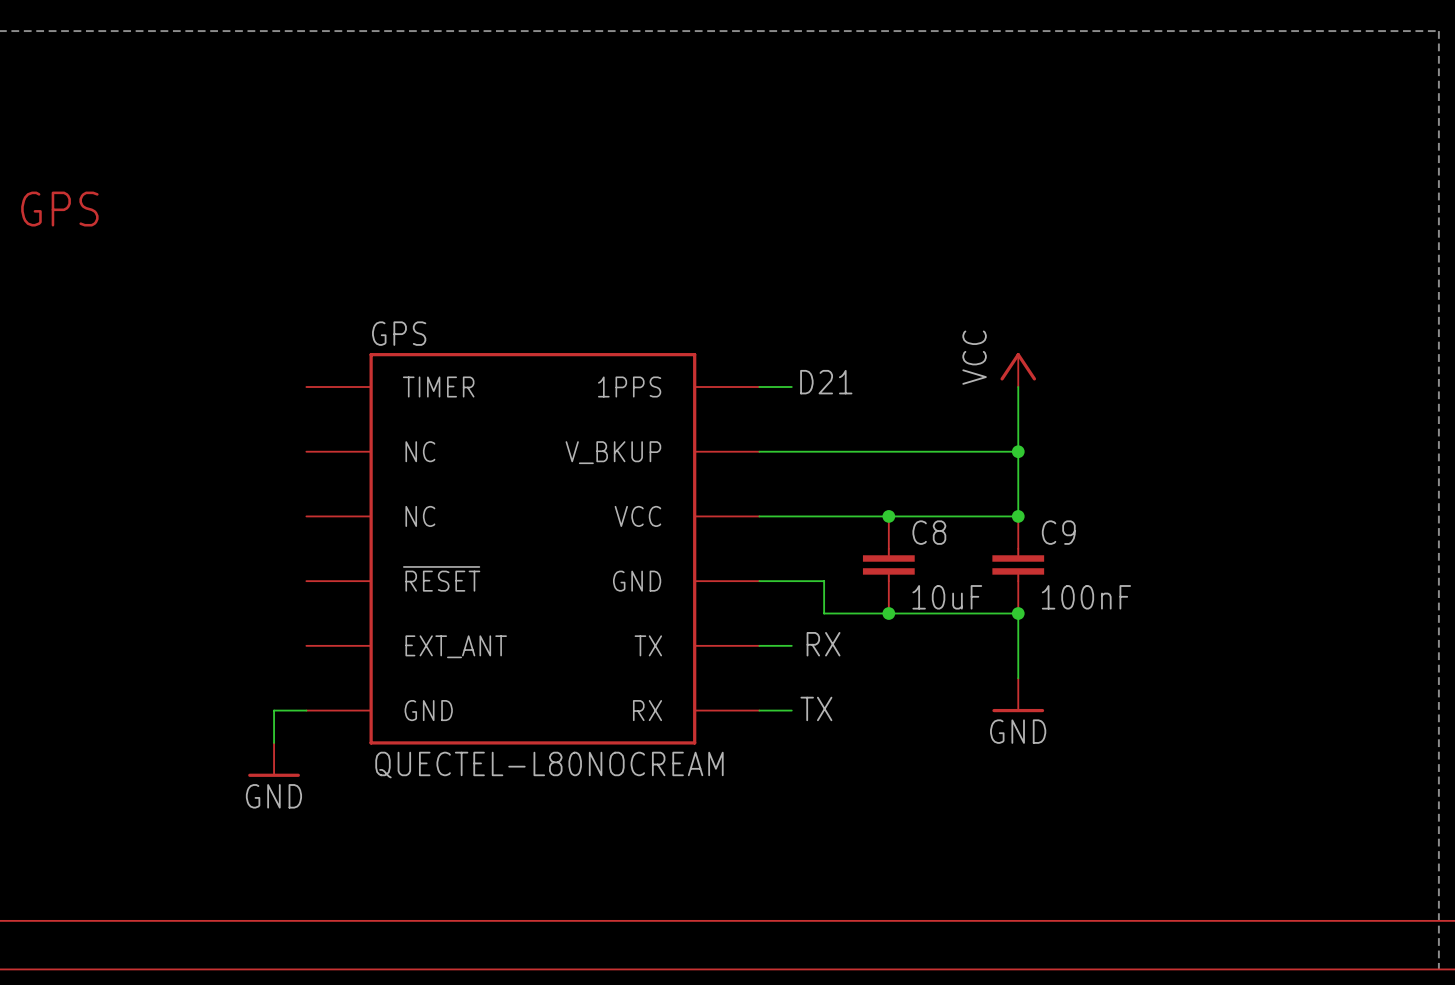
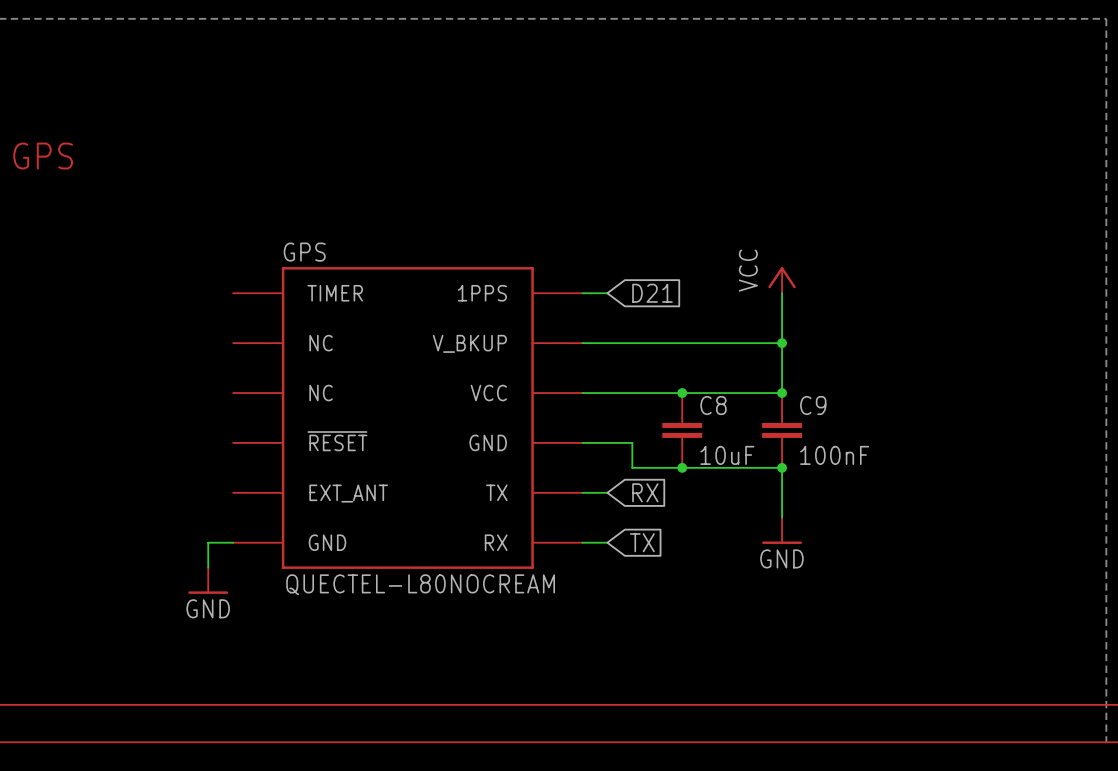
label: D21 (826, 382) -> none
global label: none -> D21 (652, 293)
label: RX (823, 644) -> none
global label: none -> RX (645, 492)
label: TX (816, 708) -> none
global label: none -> TX (642, 542)

